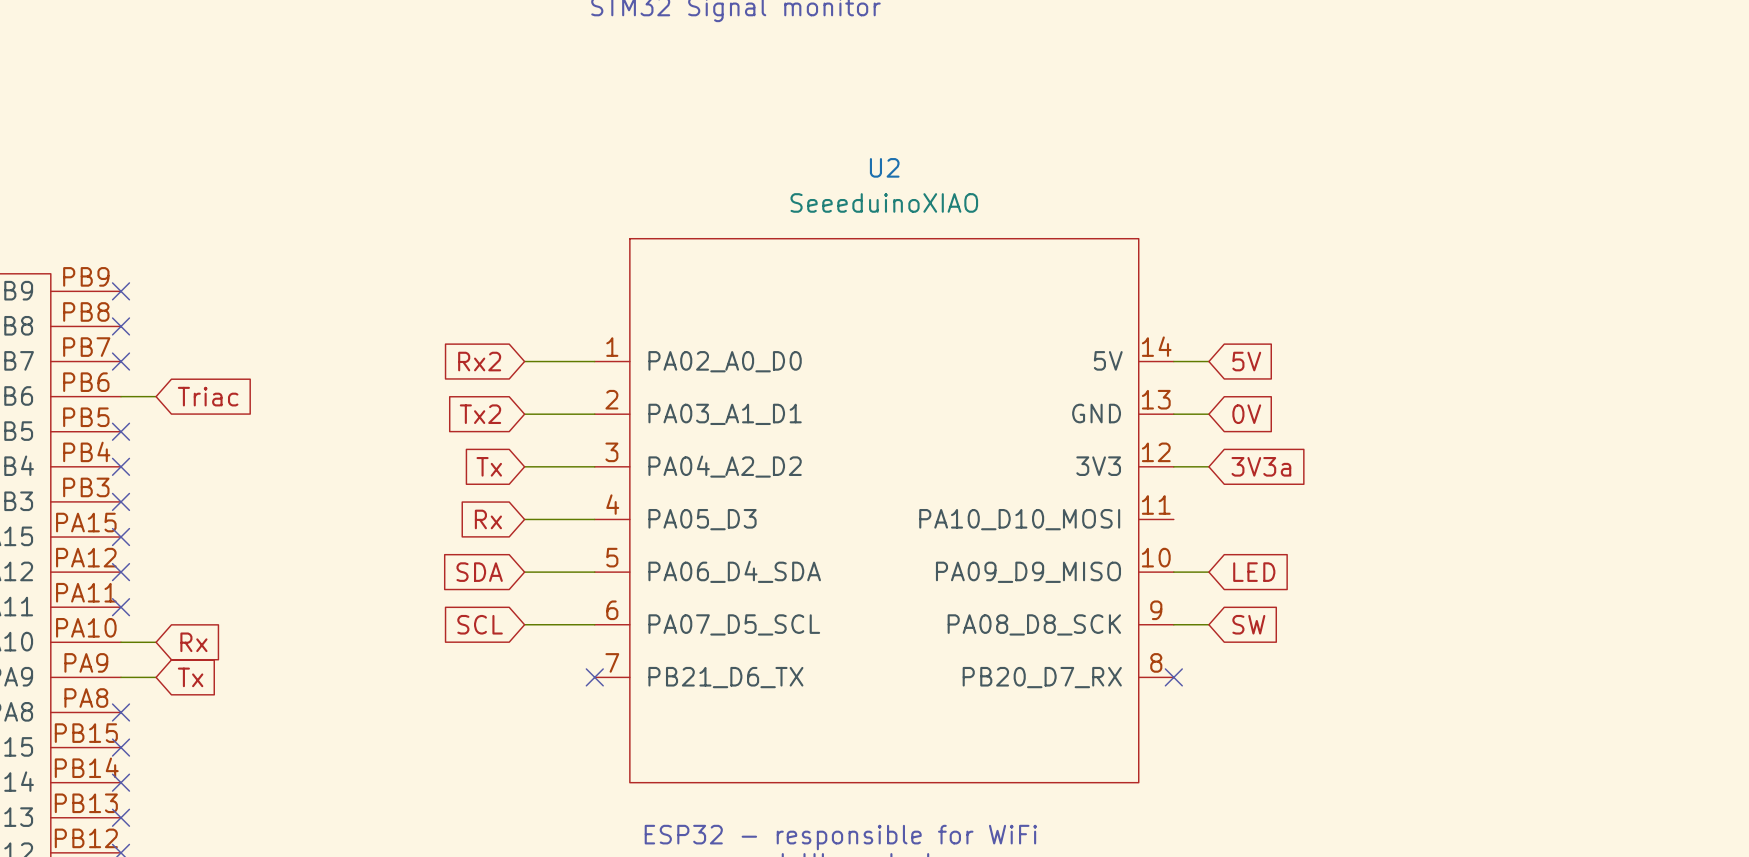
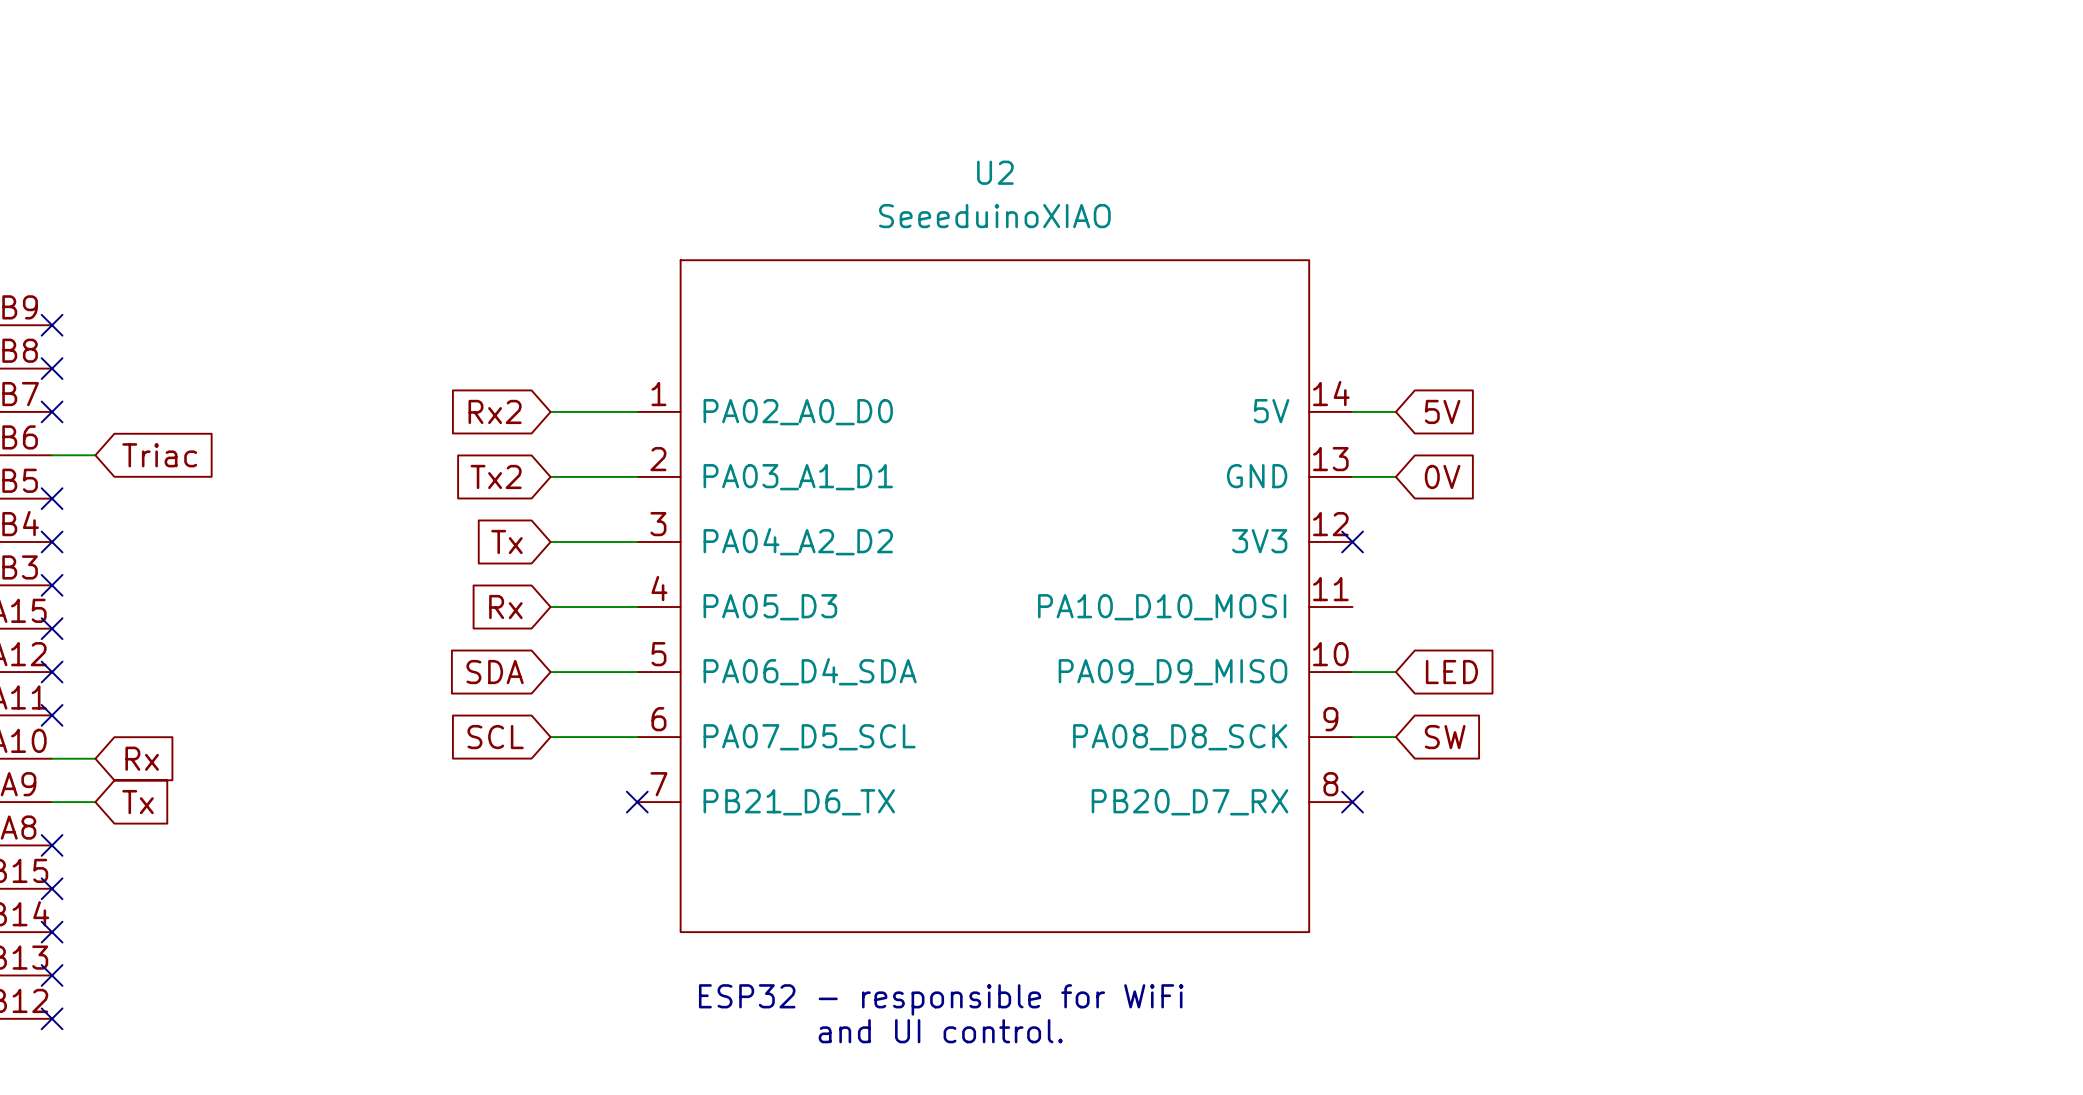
wire: (1173, 466) (1208, 466) -> none
no-connect mark: none -> (1352, 541)
global label: 3V3a (1261, 466) -> none

